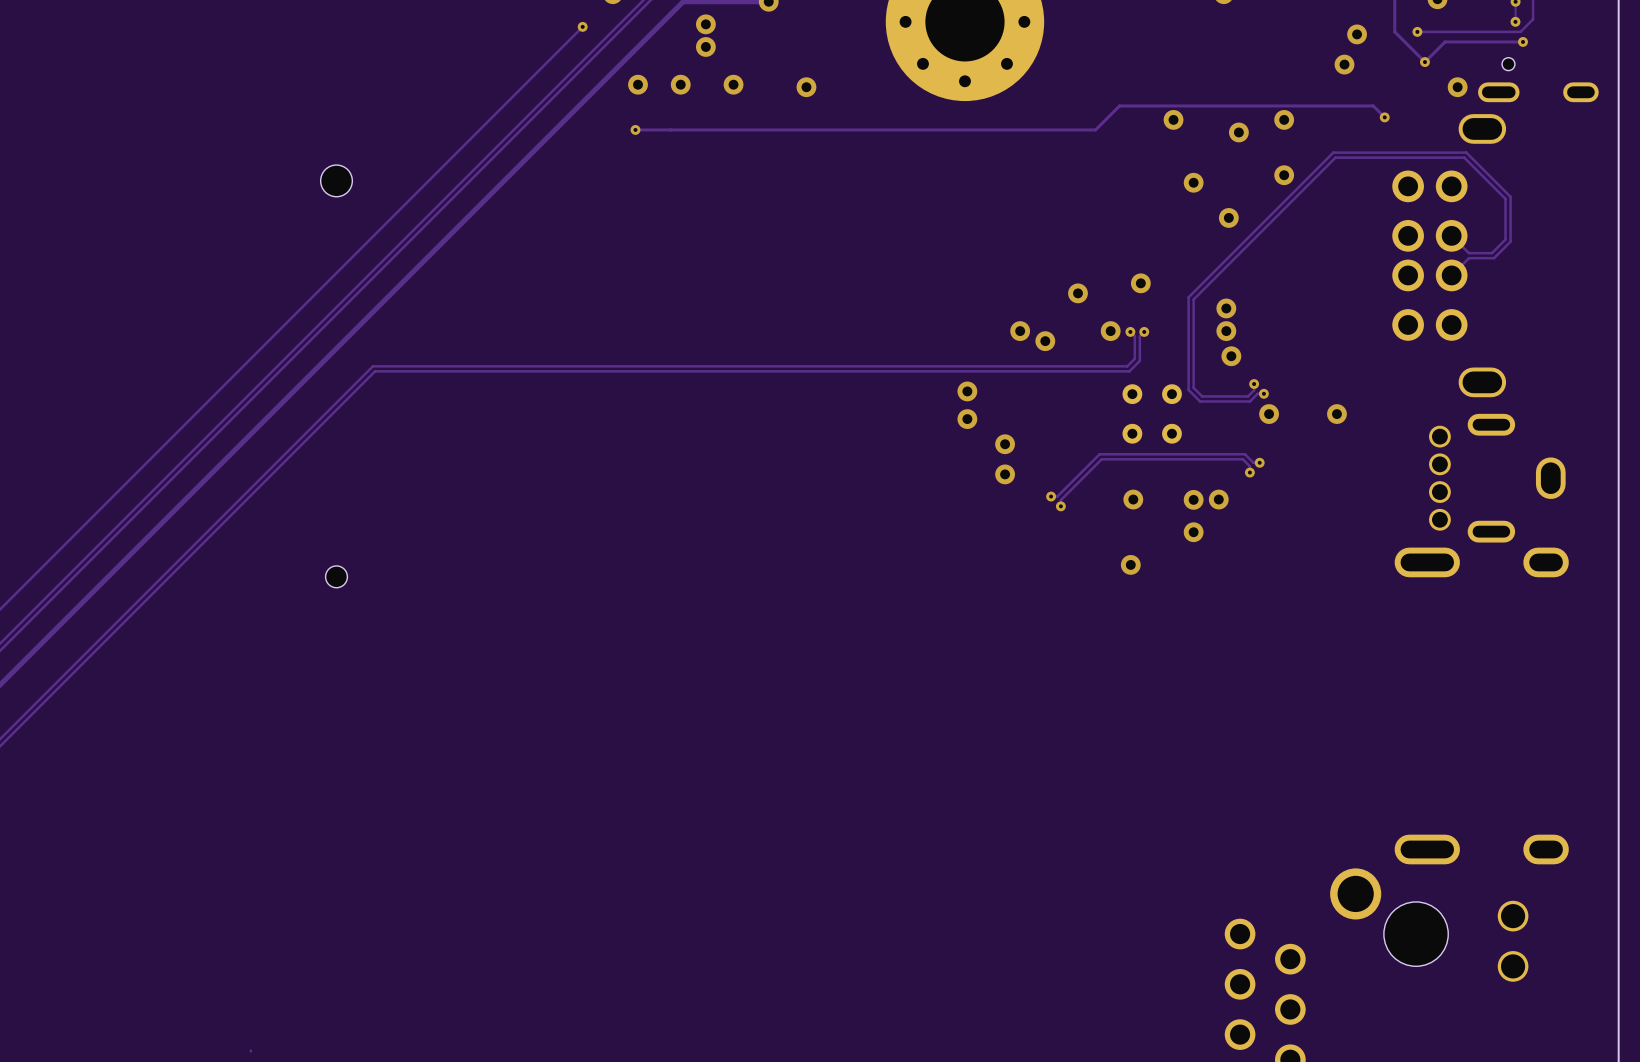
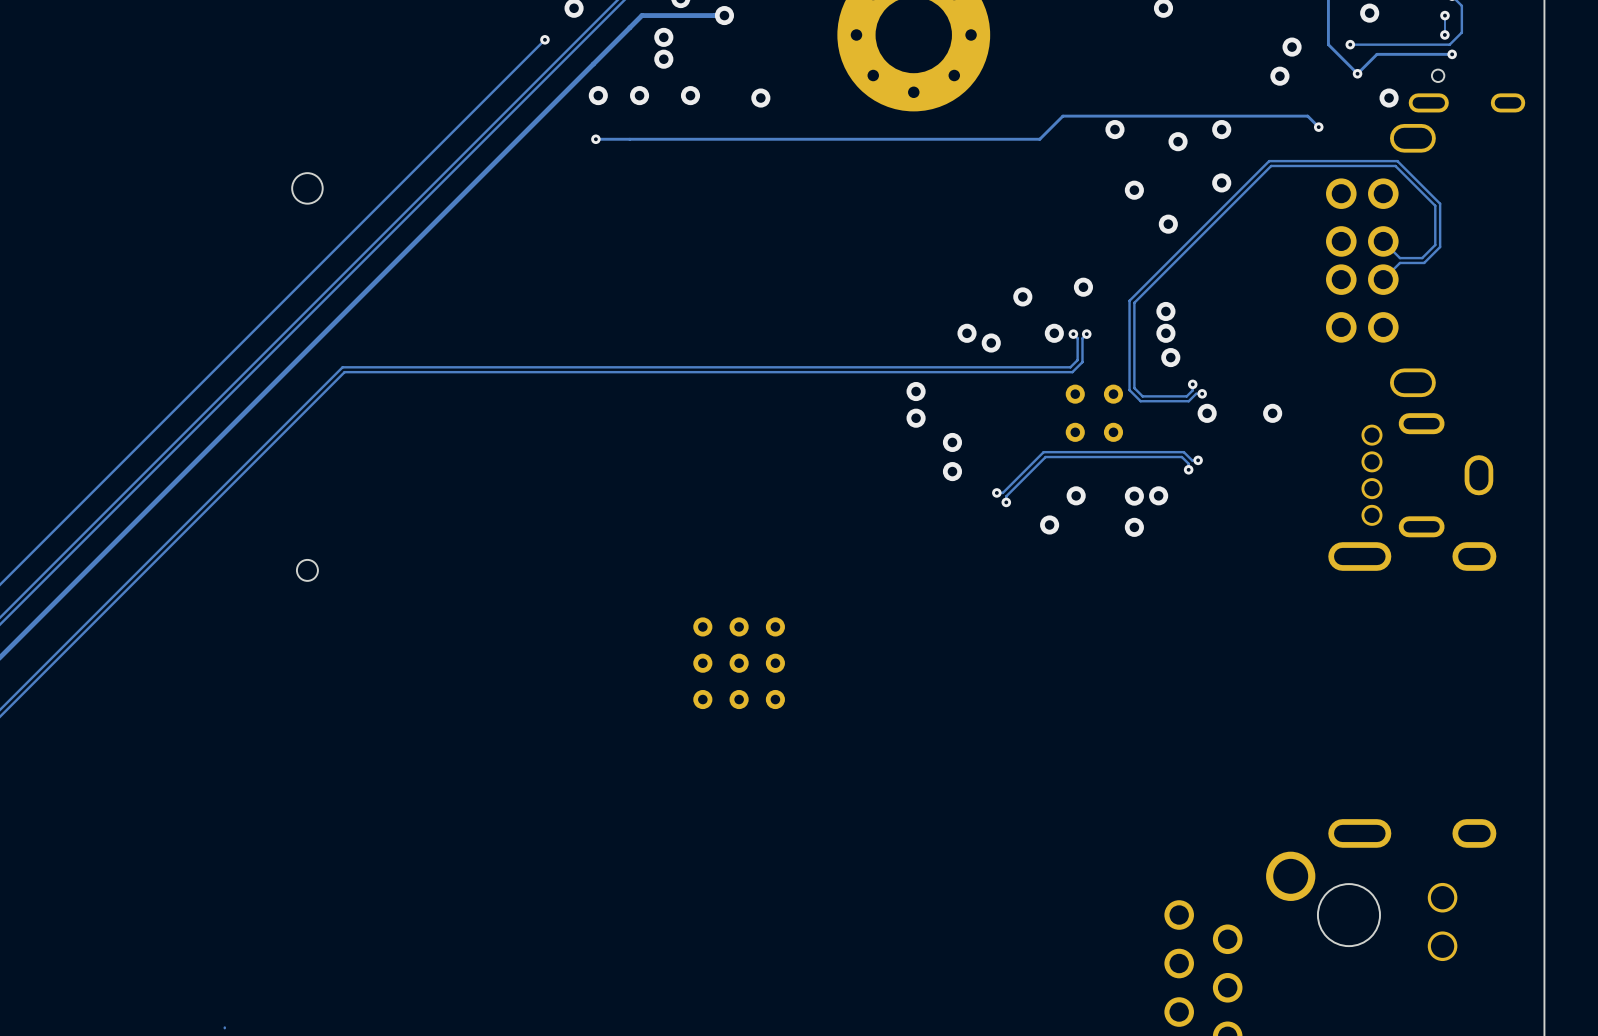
via position: (1130, 564) -> (1049, 524)
part: none -> (739, 663)

